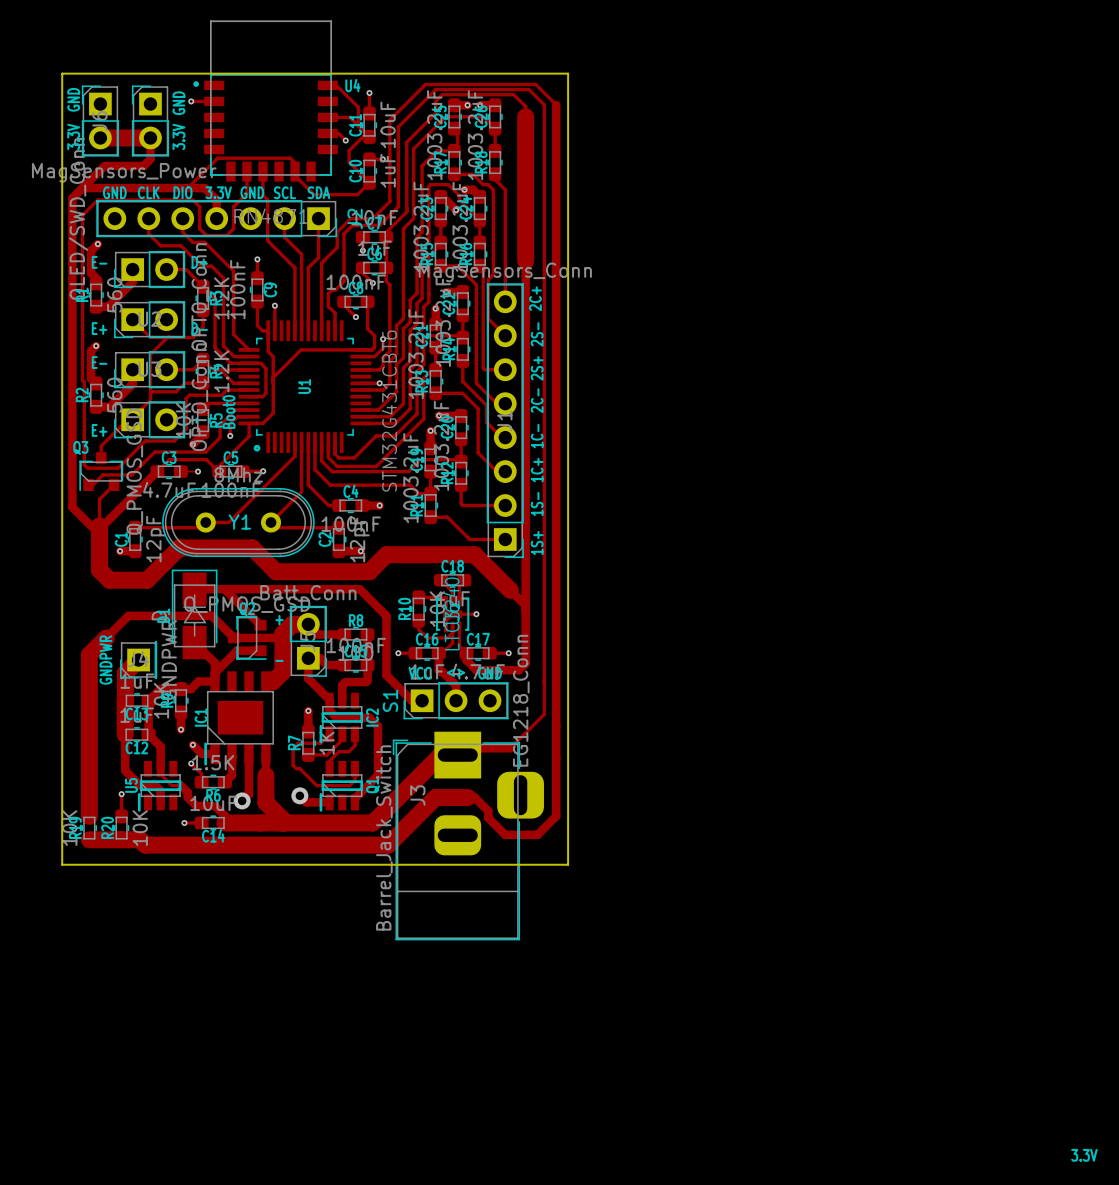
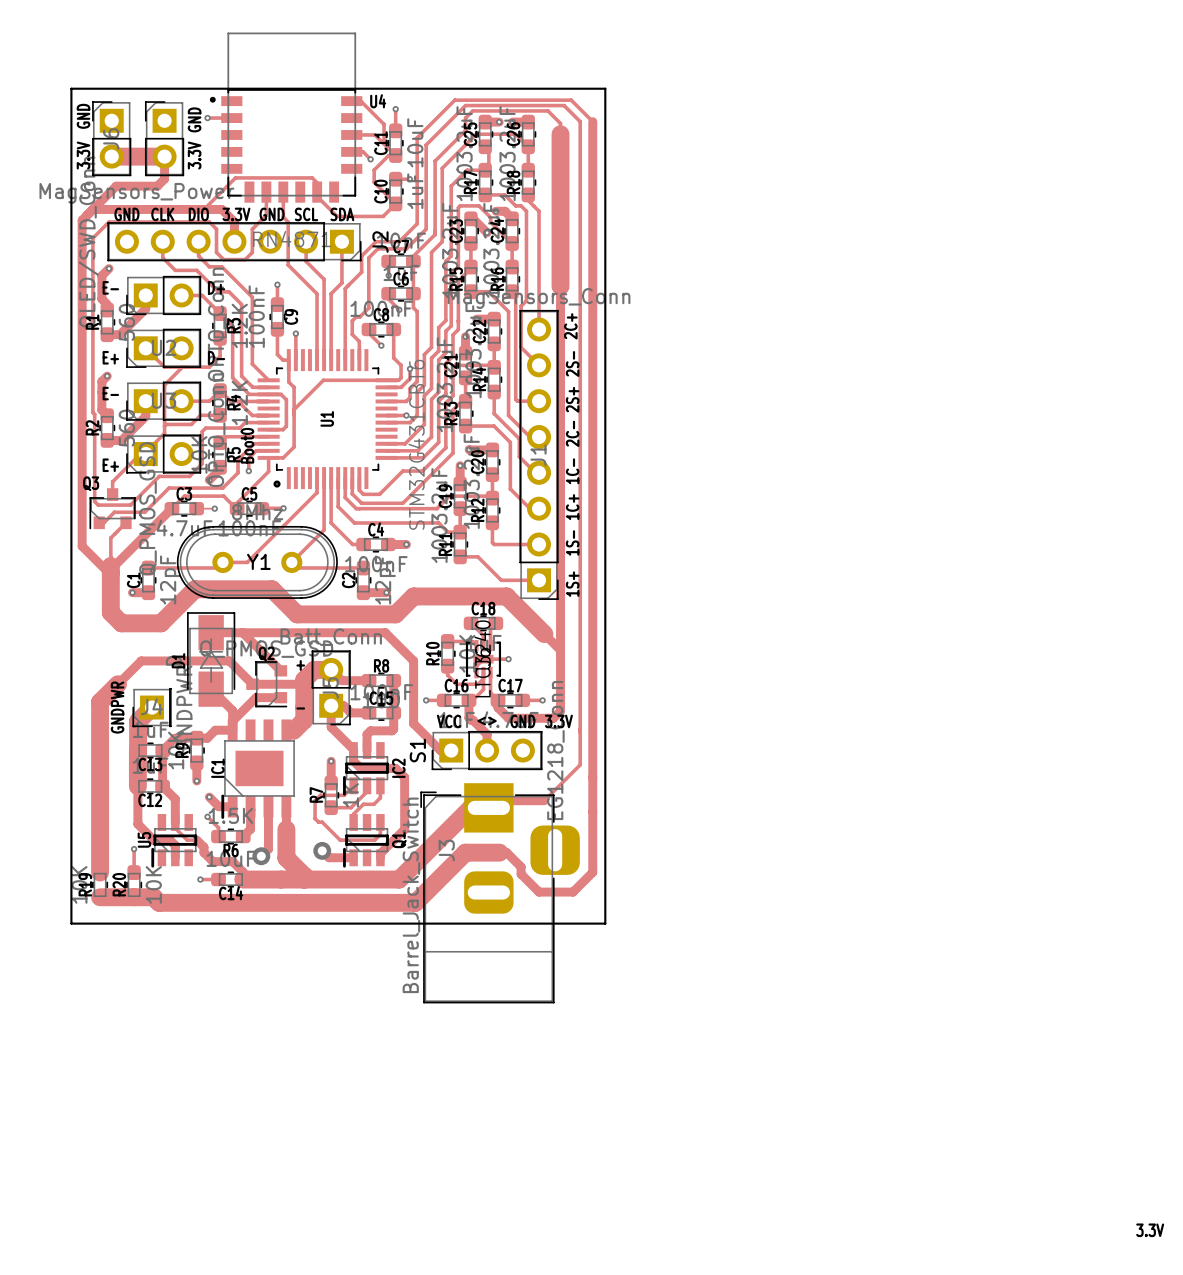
text: none -> 3.3V (558, 721)

